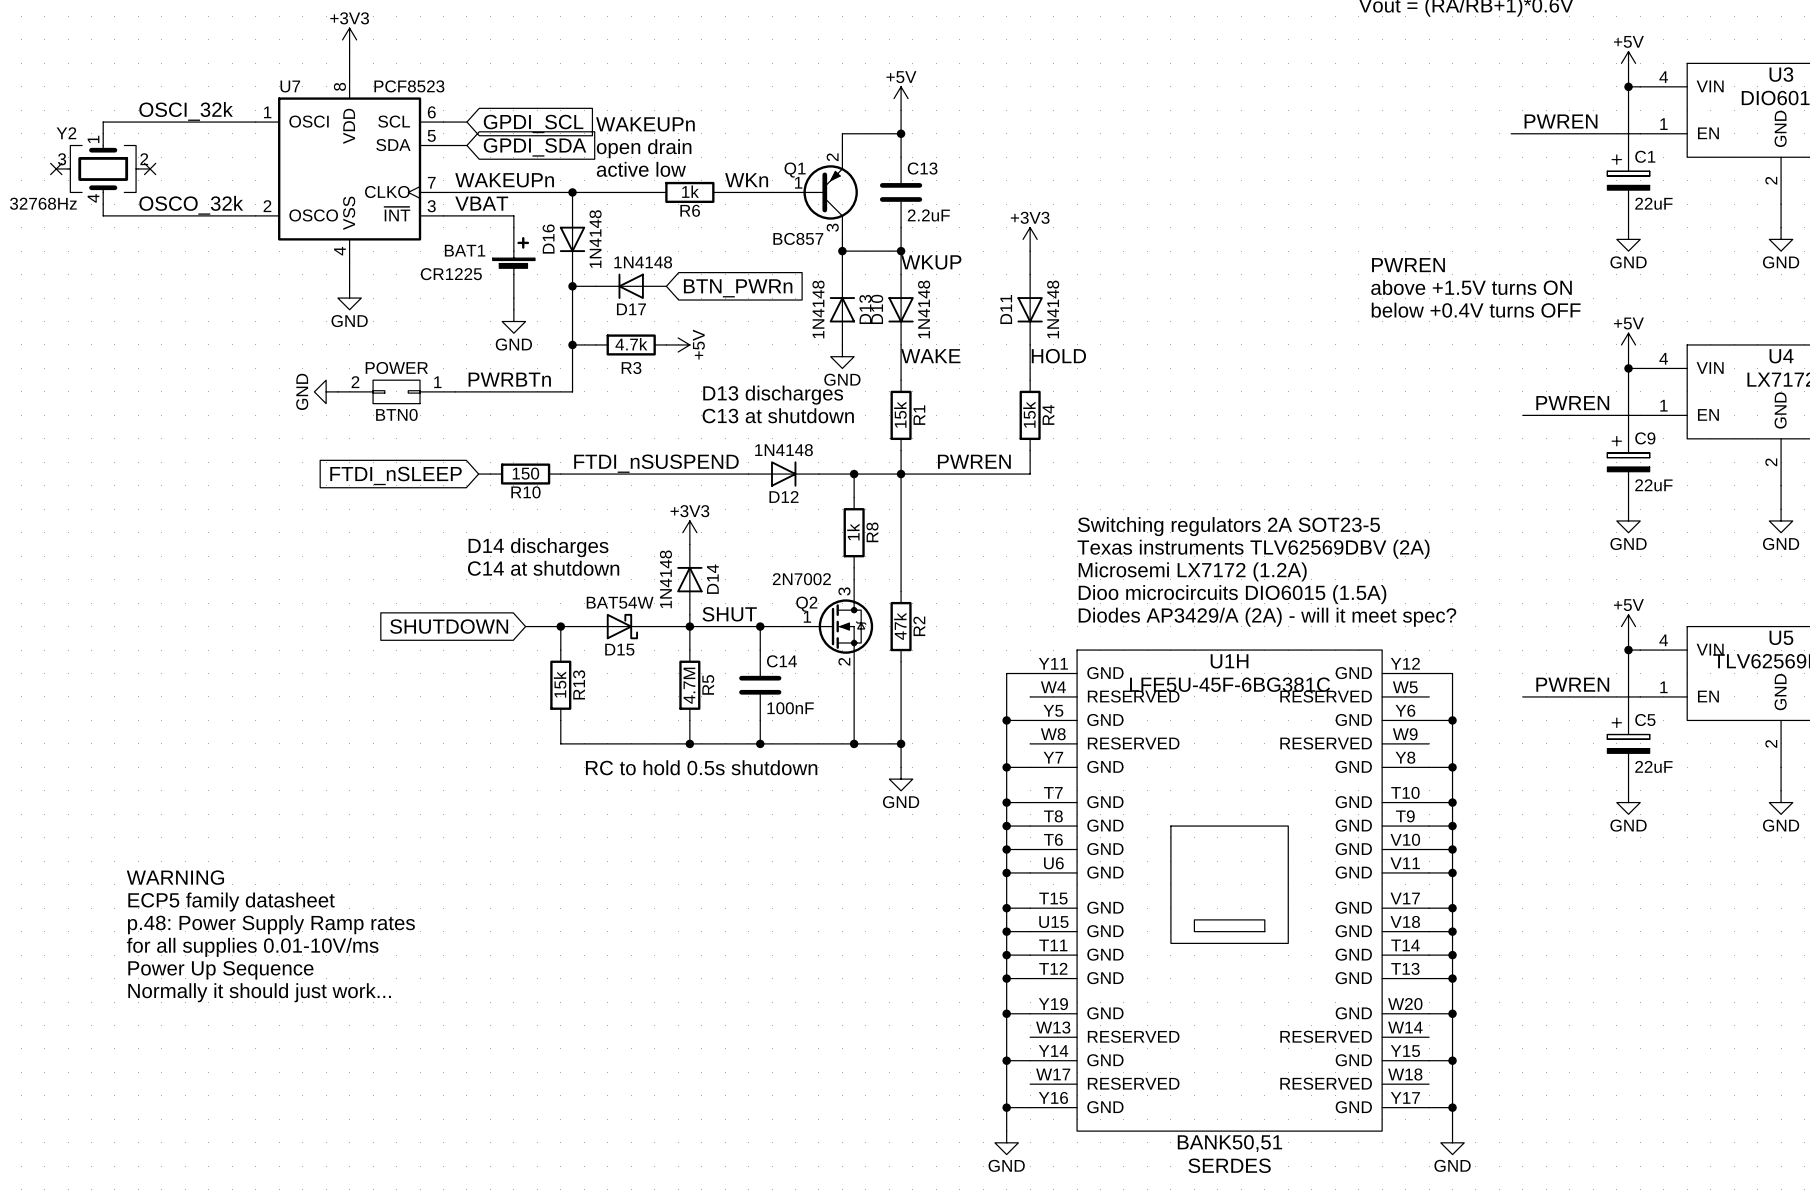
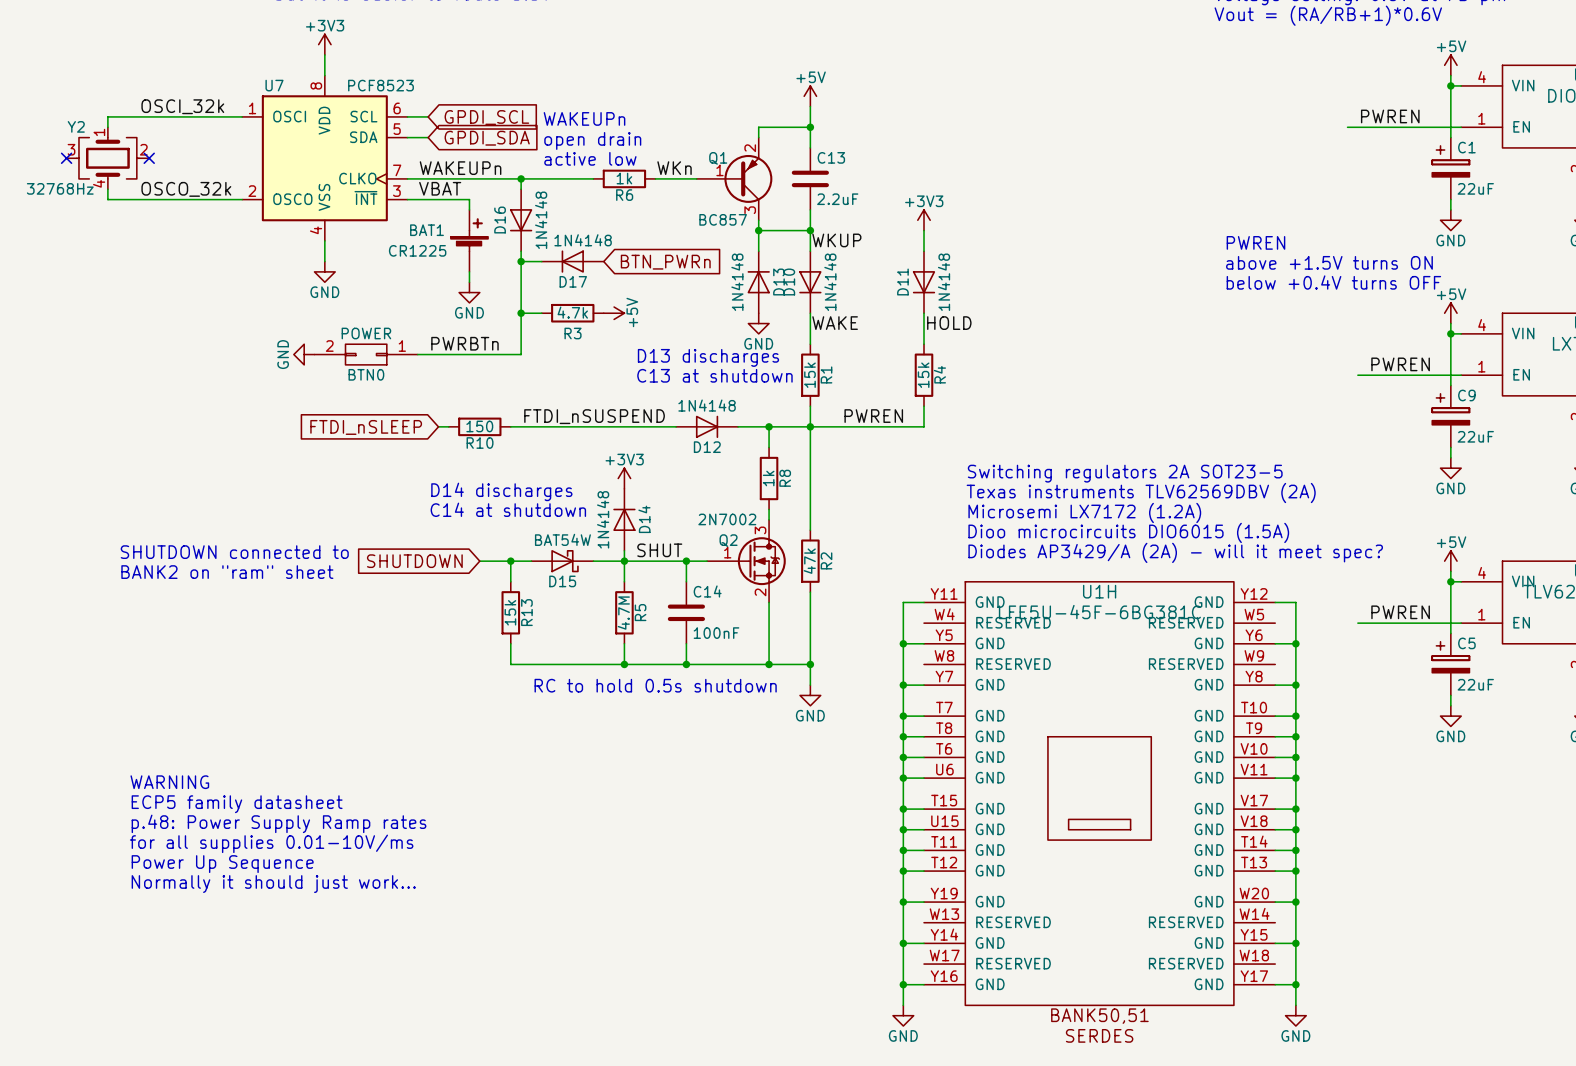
text: none -> SHUTDOWN connected to (234, 552)
text: none -> BANK2 on "ram" sheet (227, 572)

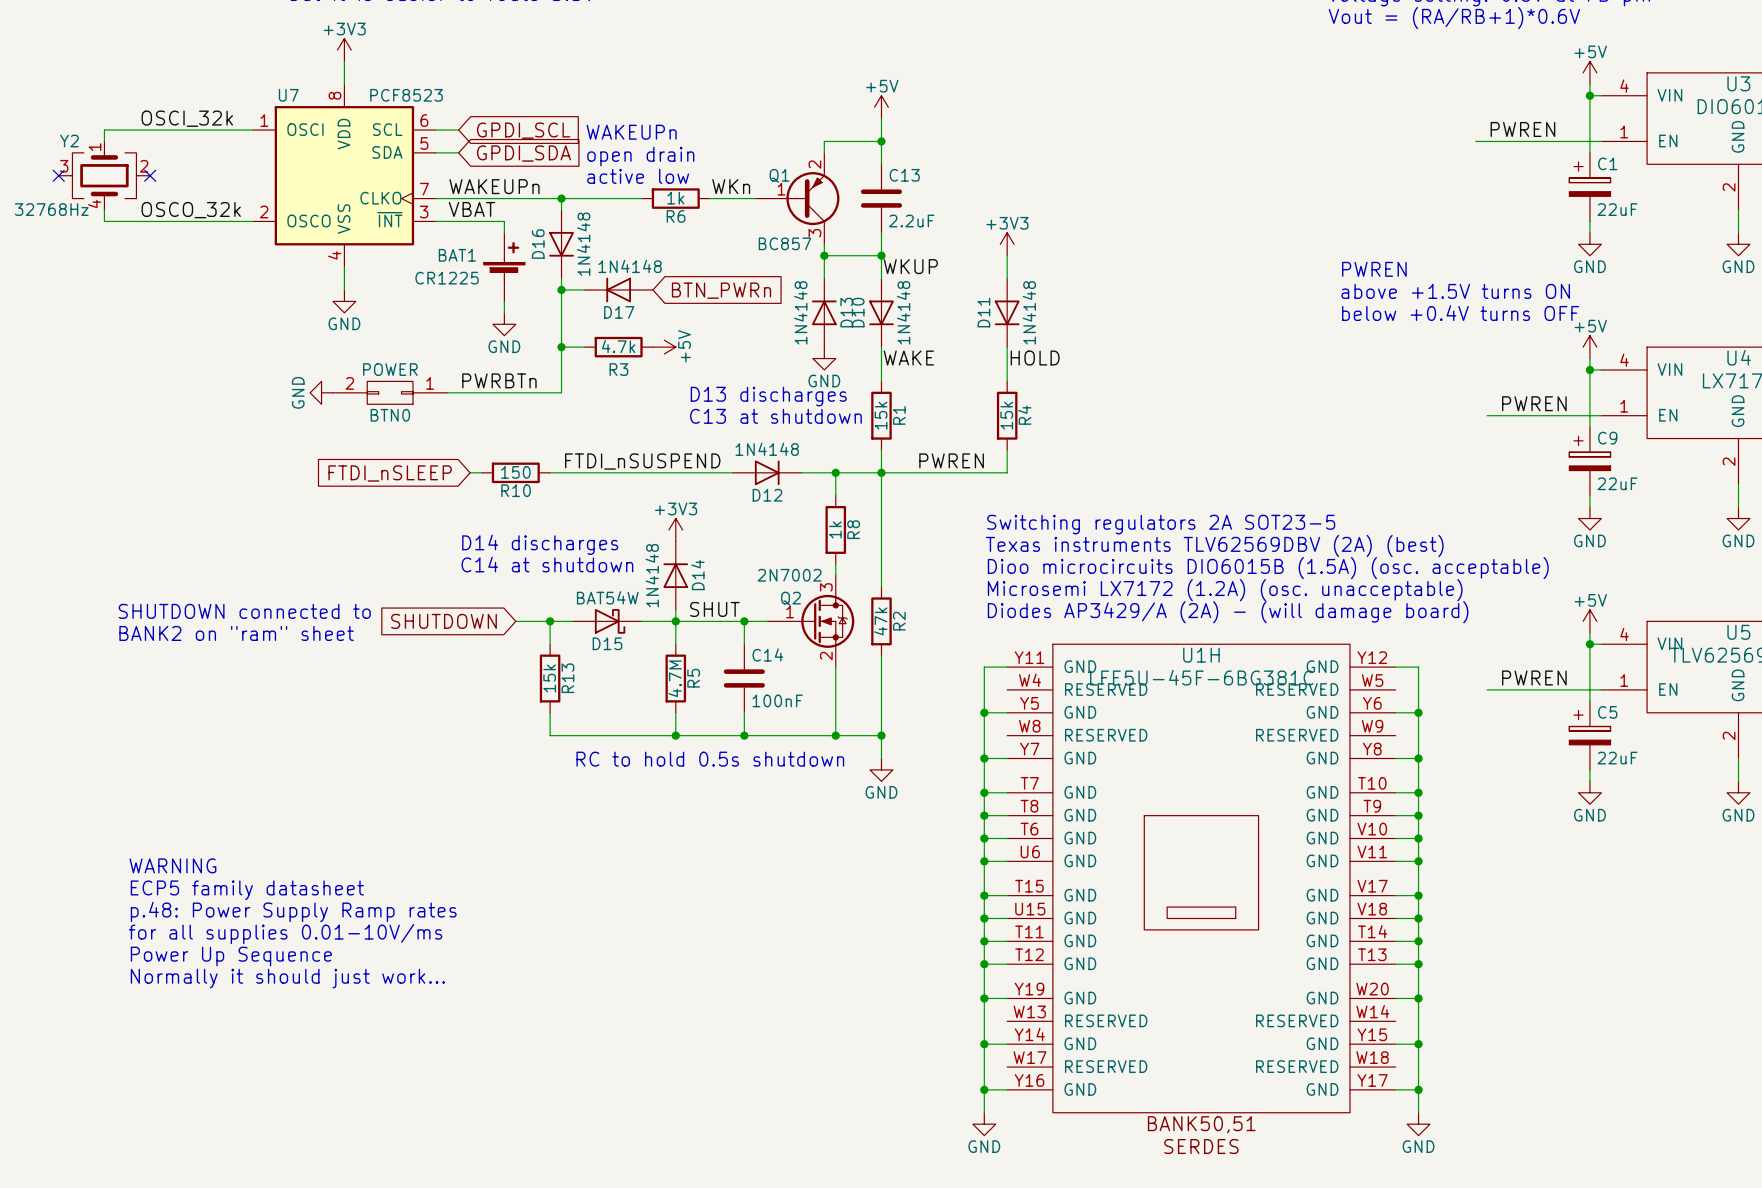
text position: Switching regulators 2A SOT23-5 (1125, 473) -> Switching regulators 2A SOT23-5 (1161, 524)
text: Texas instruments TLV62569DBV (2A) (1141, 493) -> Texas instruments TLV62569DBV (2A) (best) (1214, 546)
text: Microsemi LX7172 (1.2A) (1084, 512) -> Microsemi LX7172 (1.2A) (osc. unacceptable) (1225, 590)
text: Dioo microcircuits DIO6015 (1.5A) (1128, 532) -> Dioo microcircuits DIO6015B (1.5A) (osc. acceptable) (1268, 568)
text: Diodes AP3429/A (2A) - will it meet spec? (1175, 552) -> Diodes AP3429/A (2A) - (will damage board) (1228, 612)

